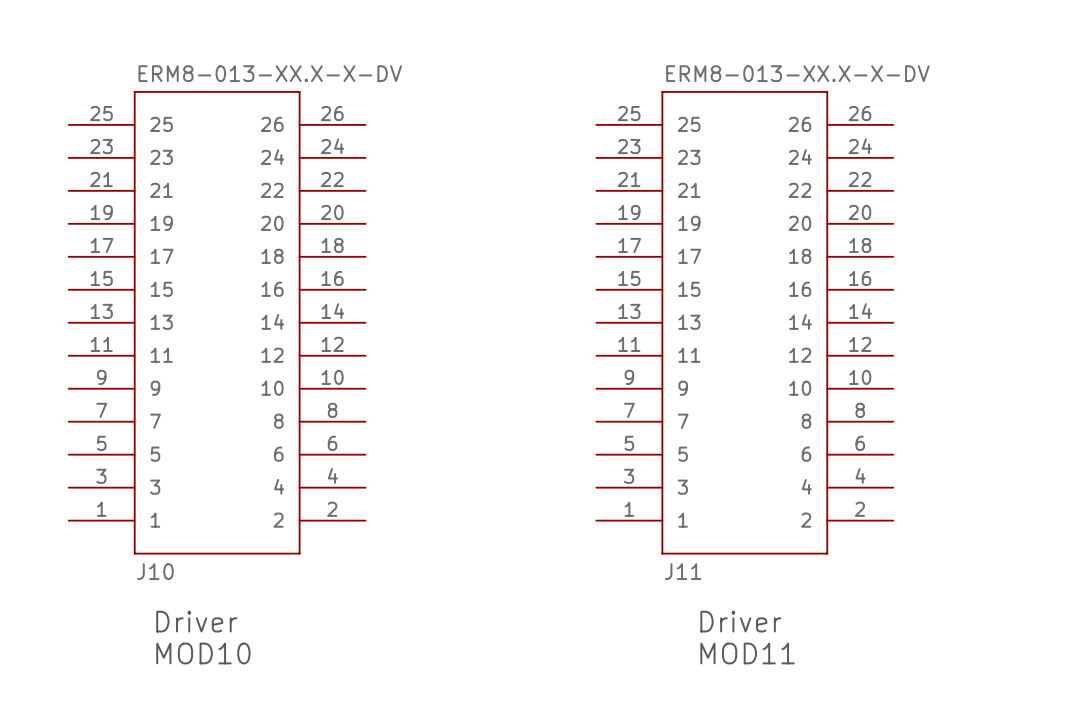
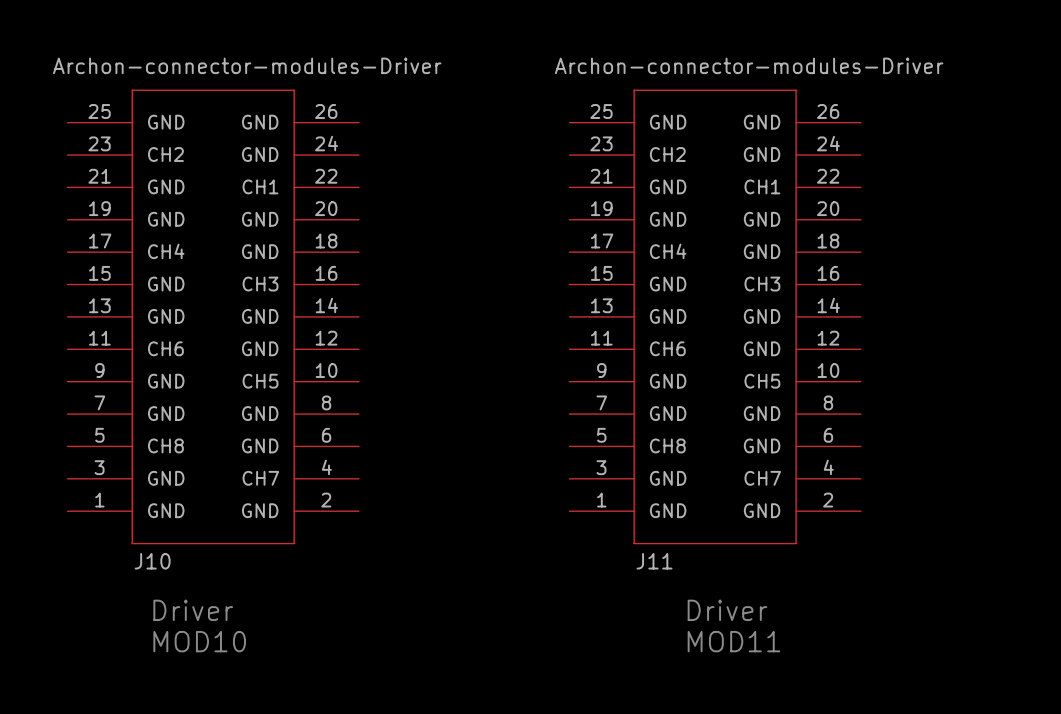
J10 value: ERM8-013-XX.X-X-DV (270, 73) -> Archon-connector-modules-Driver (247, 65)
J11 value: ERM8-013-XX.X-X-DV (797, 73) -> Archon-connector-modules-Driver (749, 65)
J10 symbol: [68, 91, 366, 554] -> [67, 90, 359, 544]
J11 symbol: [596, 91, 894, 554] -> [569, 90, 861, 544]

